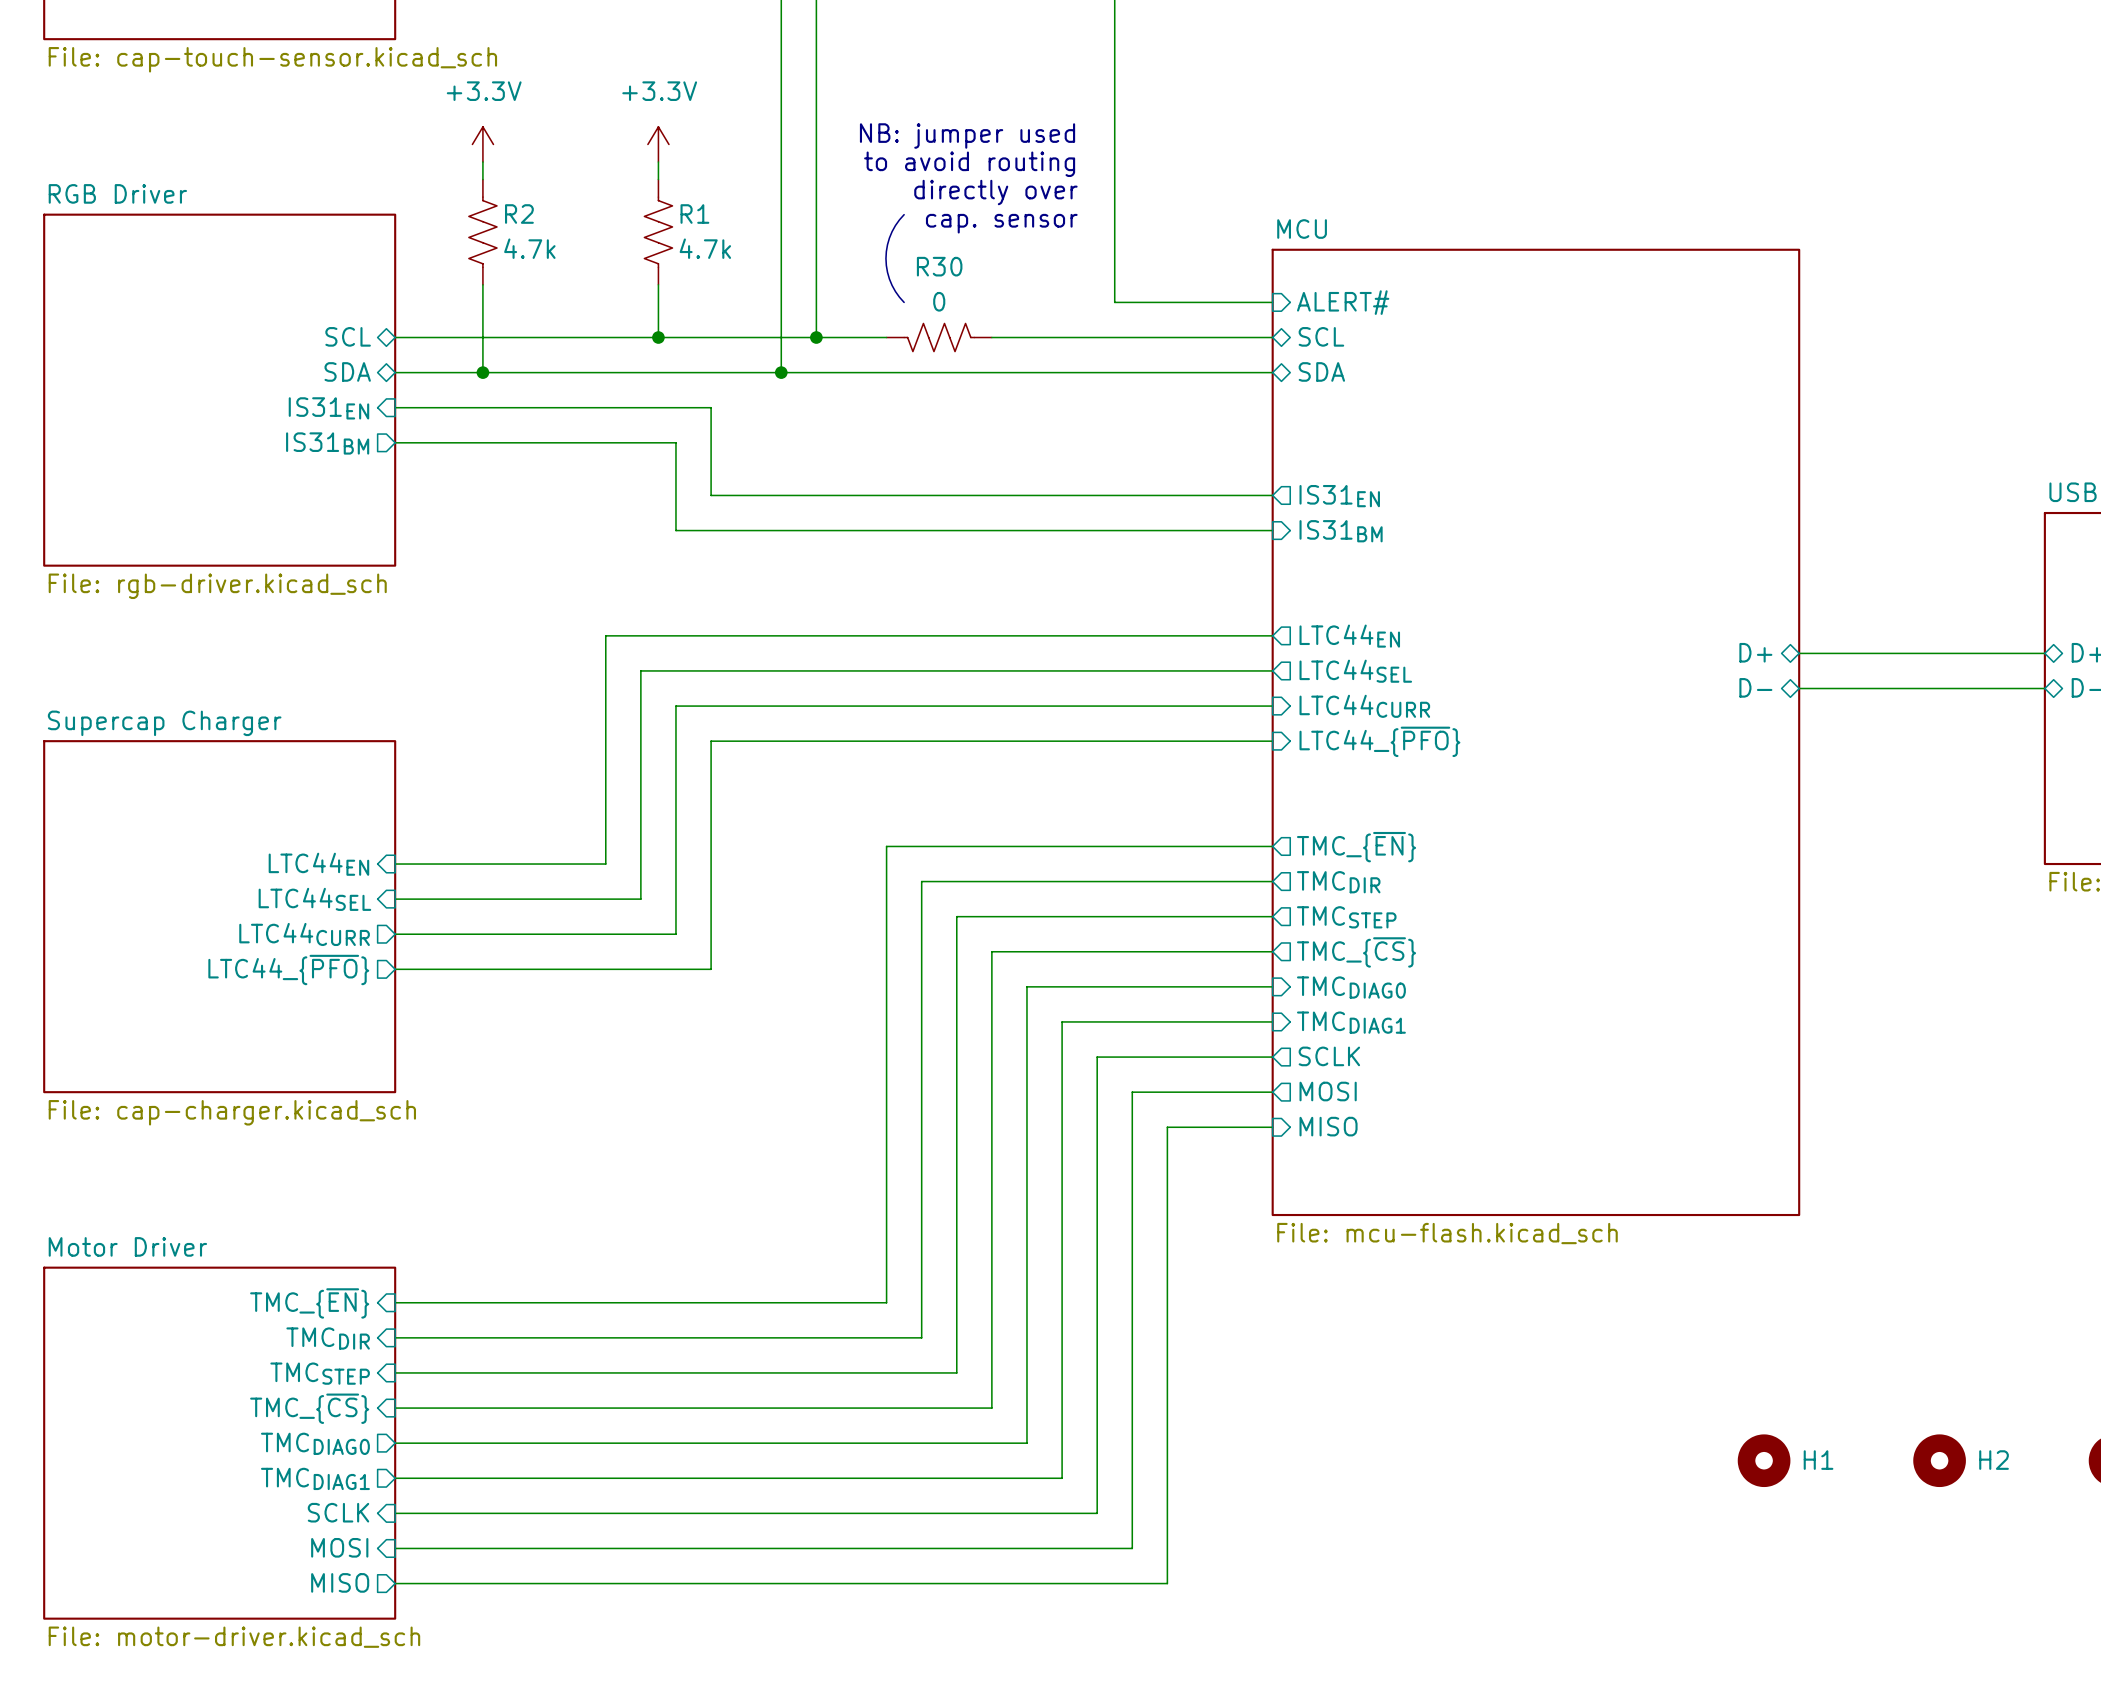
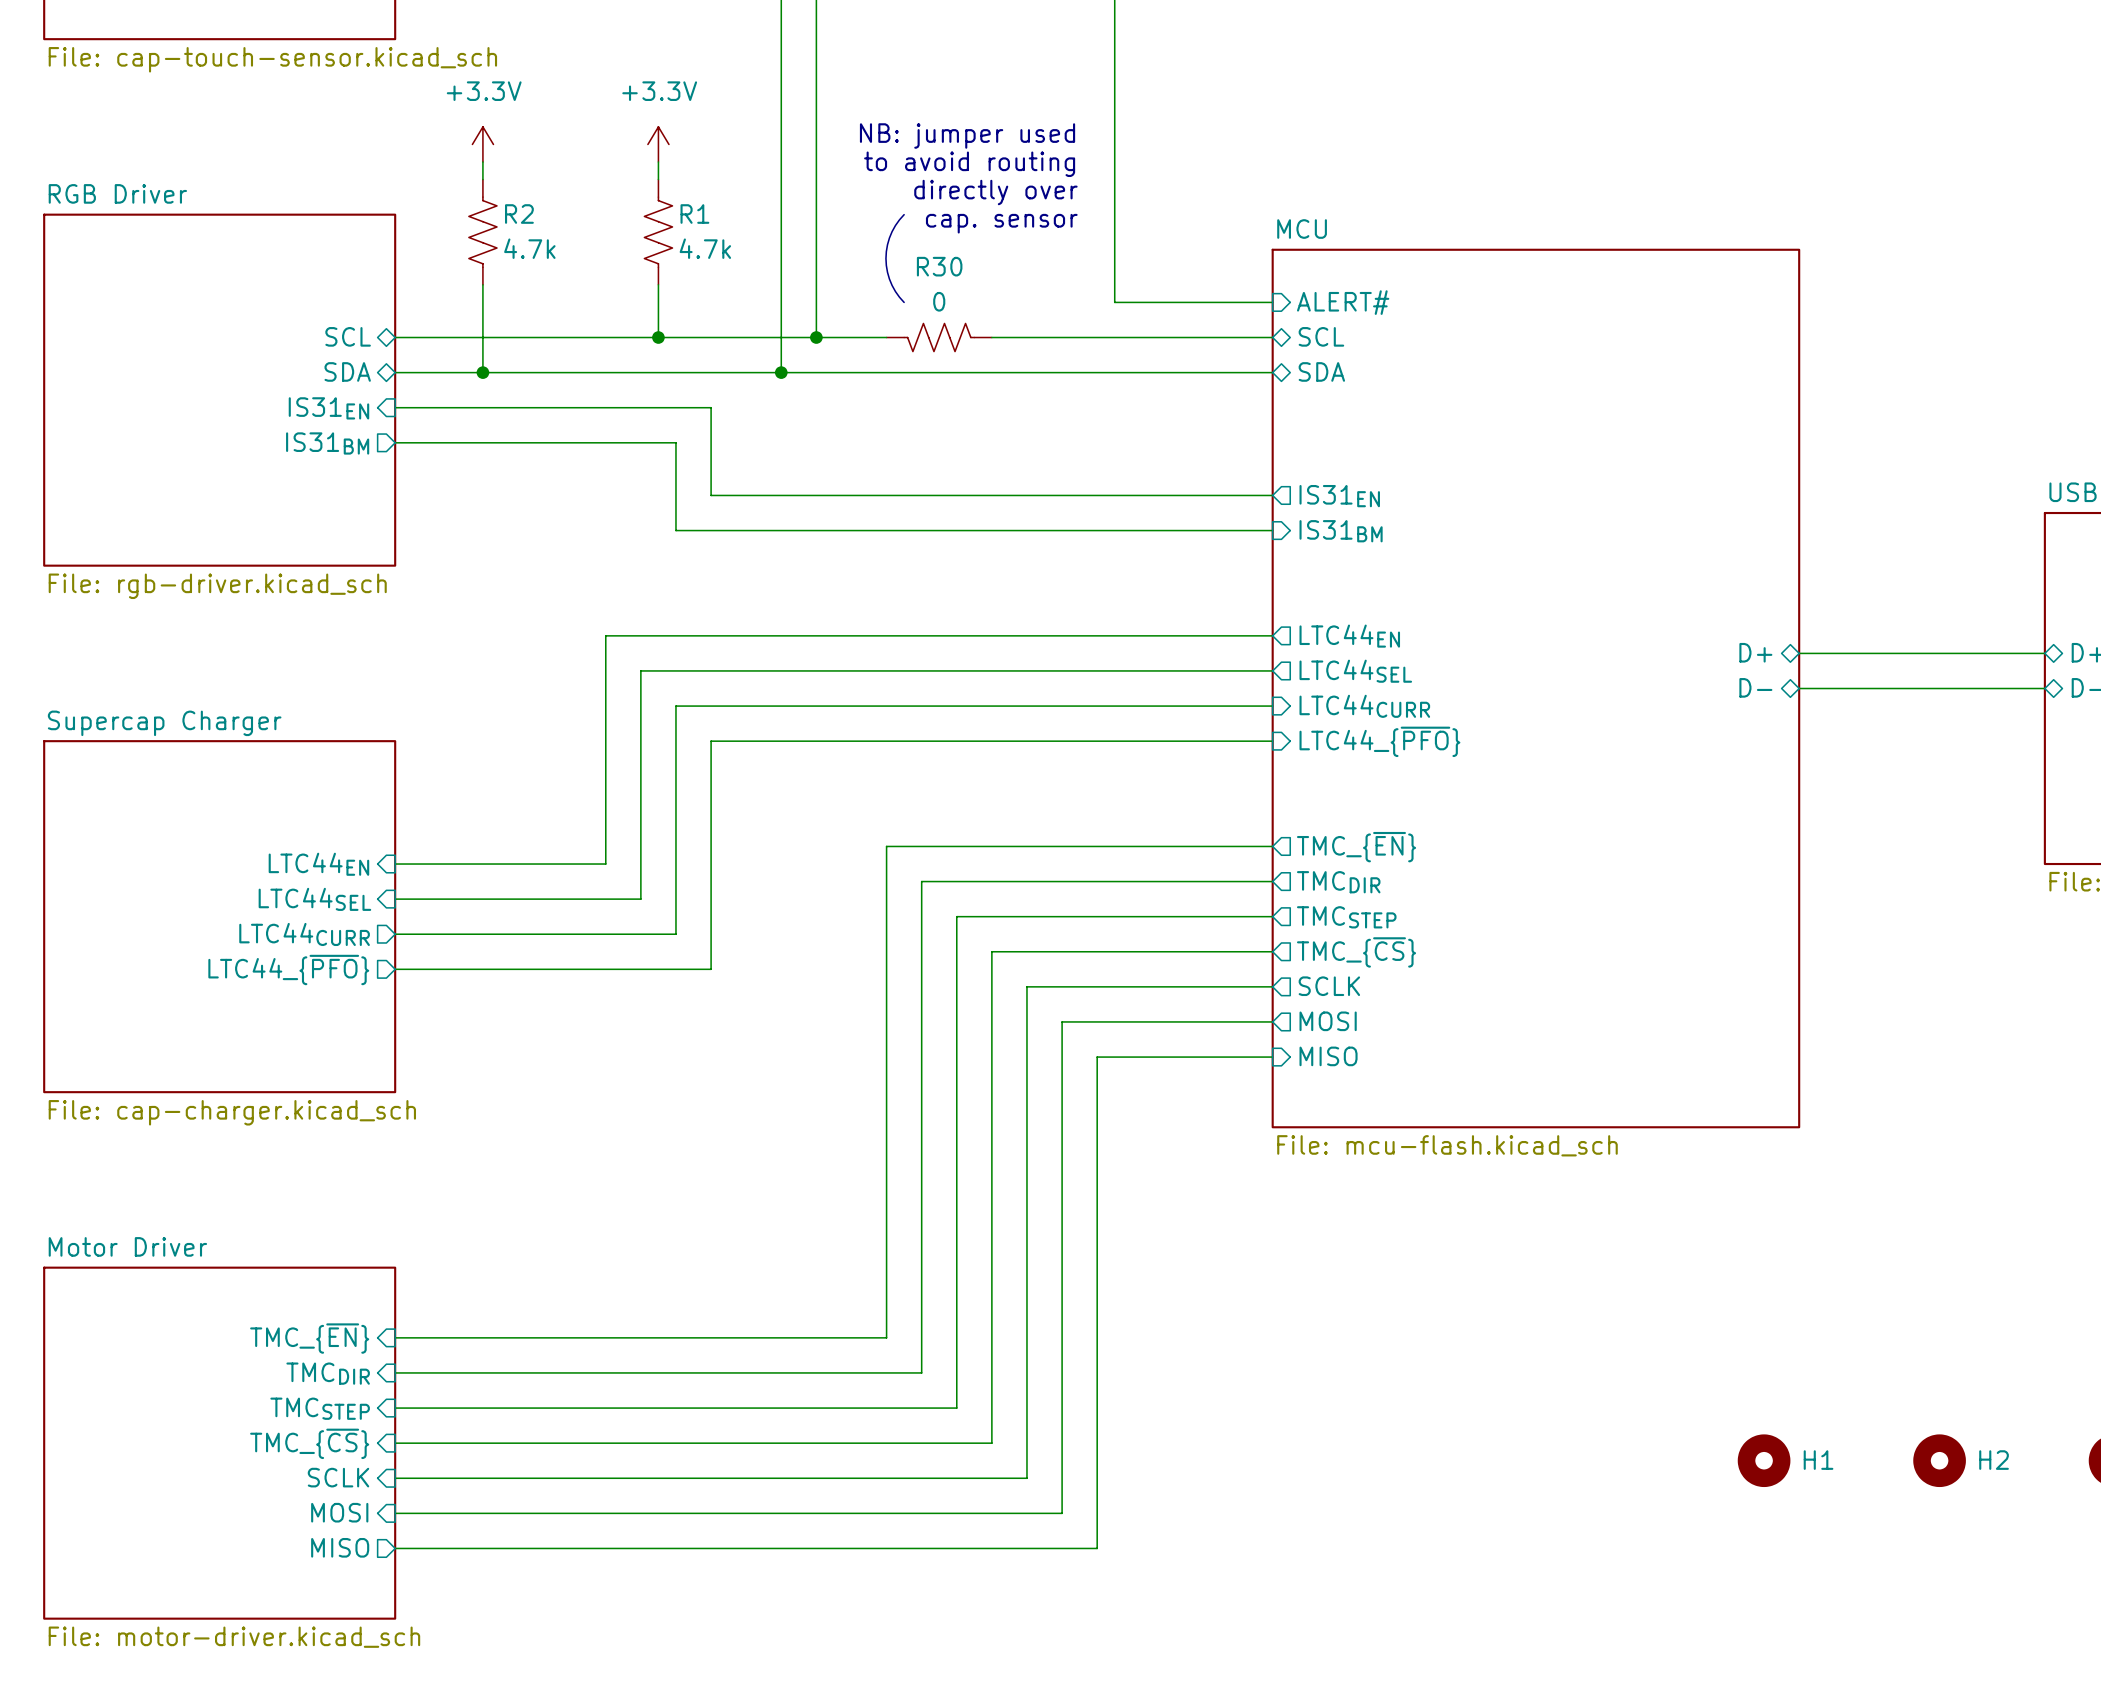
sheet MCU: none -> File: mcu-flash.kicad_sch (1535, 688)
sheet MCU: File: mcu-flash.kicad_sch (1535, 732) -> none
sheet pin shape: input (1351, 987) -> output (1329, 986)
sheet pin: TMCDIAG0 (1351, 987) -> SCLK (1329, 986)
sheet pin shape: input (1351, 1022) -> output (1328, 1021)
sheet pin: TMCDIAG1 (1351, 1022) -> MOSI (1328, 1021)
sheet pin shape: output (1329, 1056) -> input (1328, 1056)
sheet pin: SCLK (1329, 1056) -> MISO (1328, 1056)
sheet pin: MOSI (1328, 1091) -> none
wire: (1272, 1092) (1132, 1092) (1132, 1548) (1097, 1548) -> (1097, 1513) (1097, 1548)
sheet pin: MISO (1328, 1126) -> none
wire: (1272, 1127) (1167, 1127) (1167, 1583) (395, 1583) -> none
wire: (395, 1302) (886, 1302) -> none
sheet pin: TMC_{~{EN}} (309, 1303) -> none
wire: (886, 1337) (921, 1337) -> (886, 1337) (886, 1302)
sheet pin: TMCDIR (328, 1338) -> TMC_{~{EN}} (309, 1338)
wire: (921, 1372) (956, 1372) -> (921, 1372) (921, 1337)
sheet pin: TMCSTEP (320, 1373) -> TMCDIR (328, 1373)
sheet pin: TMC_{~{CS}} (309, 1408) -> TMCSTEP (320, 1408)
wire: (956, 1408) (991, 1408) -> (956, 1408) (956, 1372)
sheet pin shape: output (315, 1443) -> input (309, 1443)
sheet pin: TMCDIAG0 (315, 1443) -> TMC_{~{CS}} (309, 1443)
wire: (991, 1443) (1026, 1443) -> (991, 1443) (991, 1408)
sheet pin shape: output (315, 1478) -> input (338, 1477)
sheet pin: TMCDIAG1 (315, 1478) -> SCLK (338, 1477)
wire: (1026, 1478) (1062, 1478) -> (1026, 1478) (1026, 1443)
sheet pin: SCLK (338, 1512) -> MOSI (339, 1512)
wire: (1062, 1513) (1097, 1513) -> (1062, 1513) (1062, 1478)
sheet pin shape: input (339, 1547) -> output (340, 1547)
sheet pin: MOSI (339, 1547) -> MISO (340, 1547)
sheet pin: MISO (340, 1582) -> none

